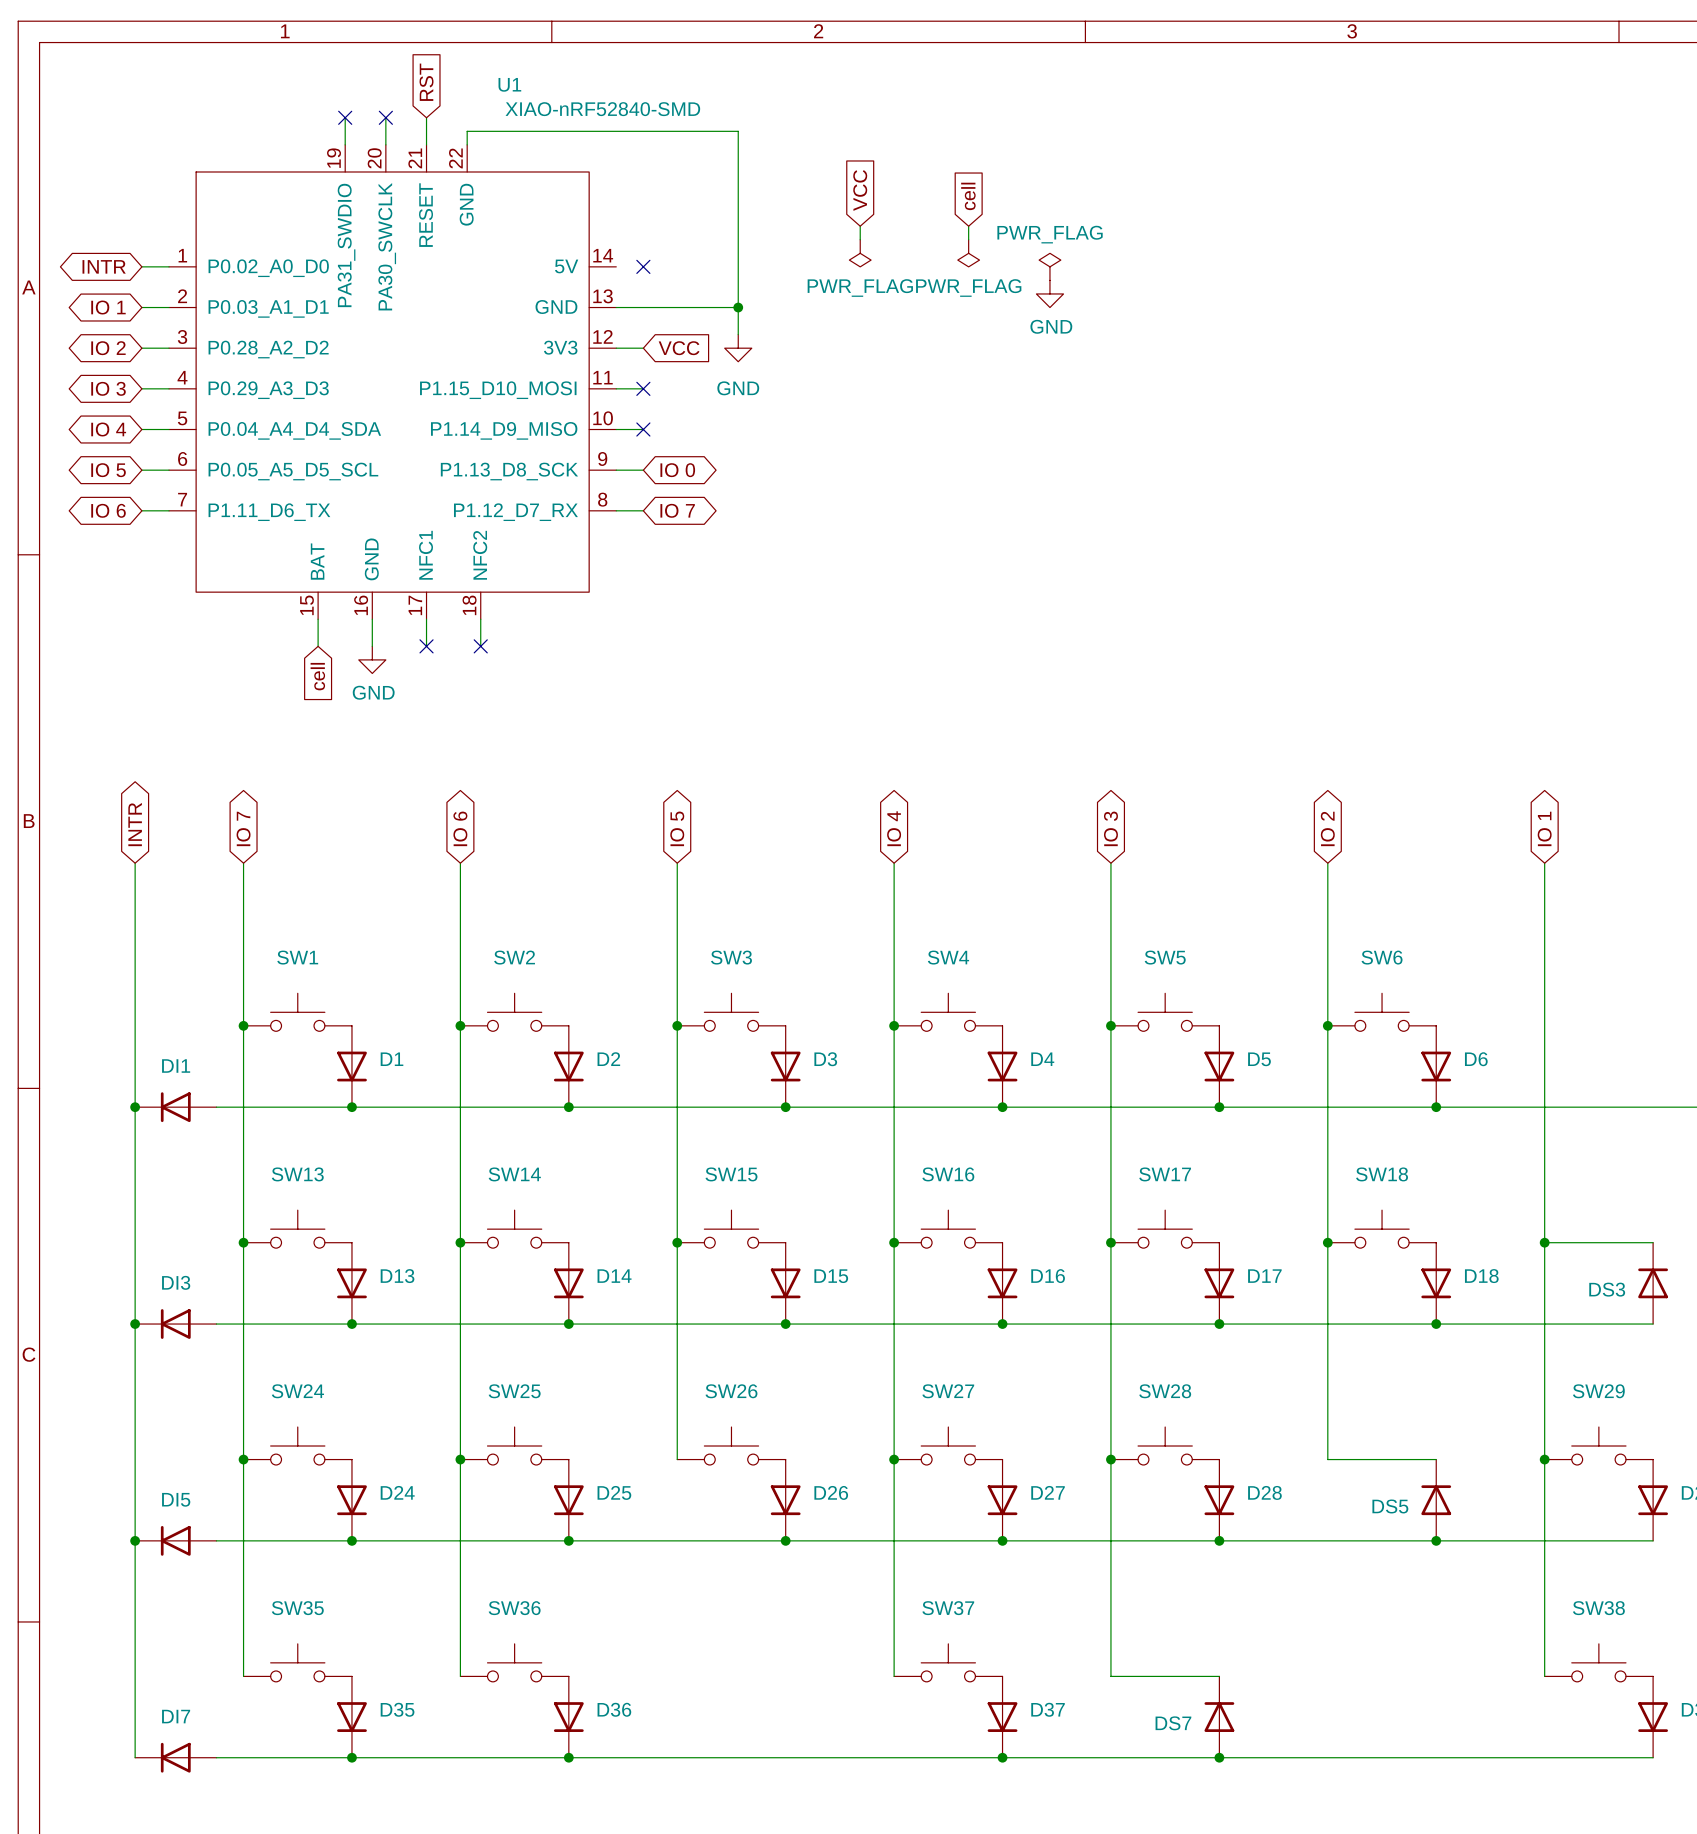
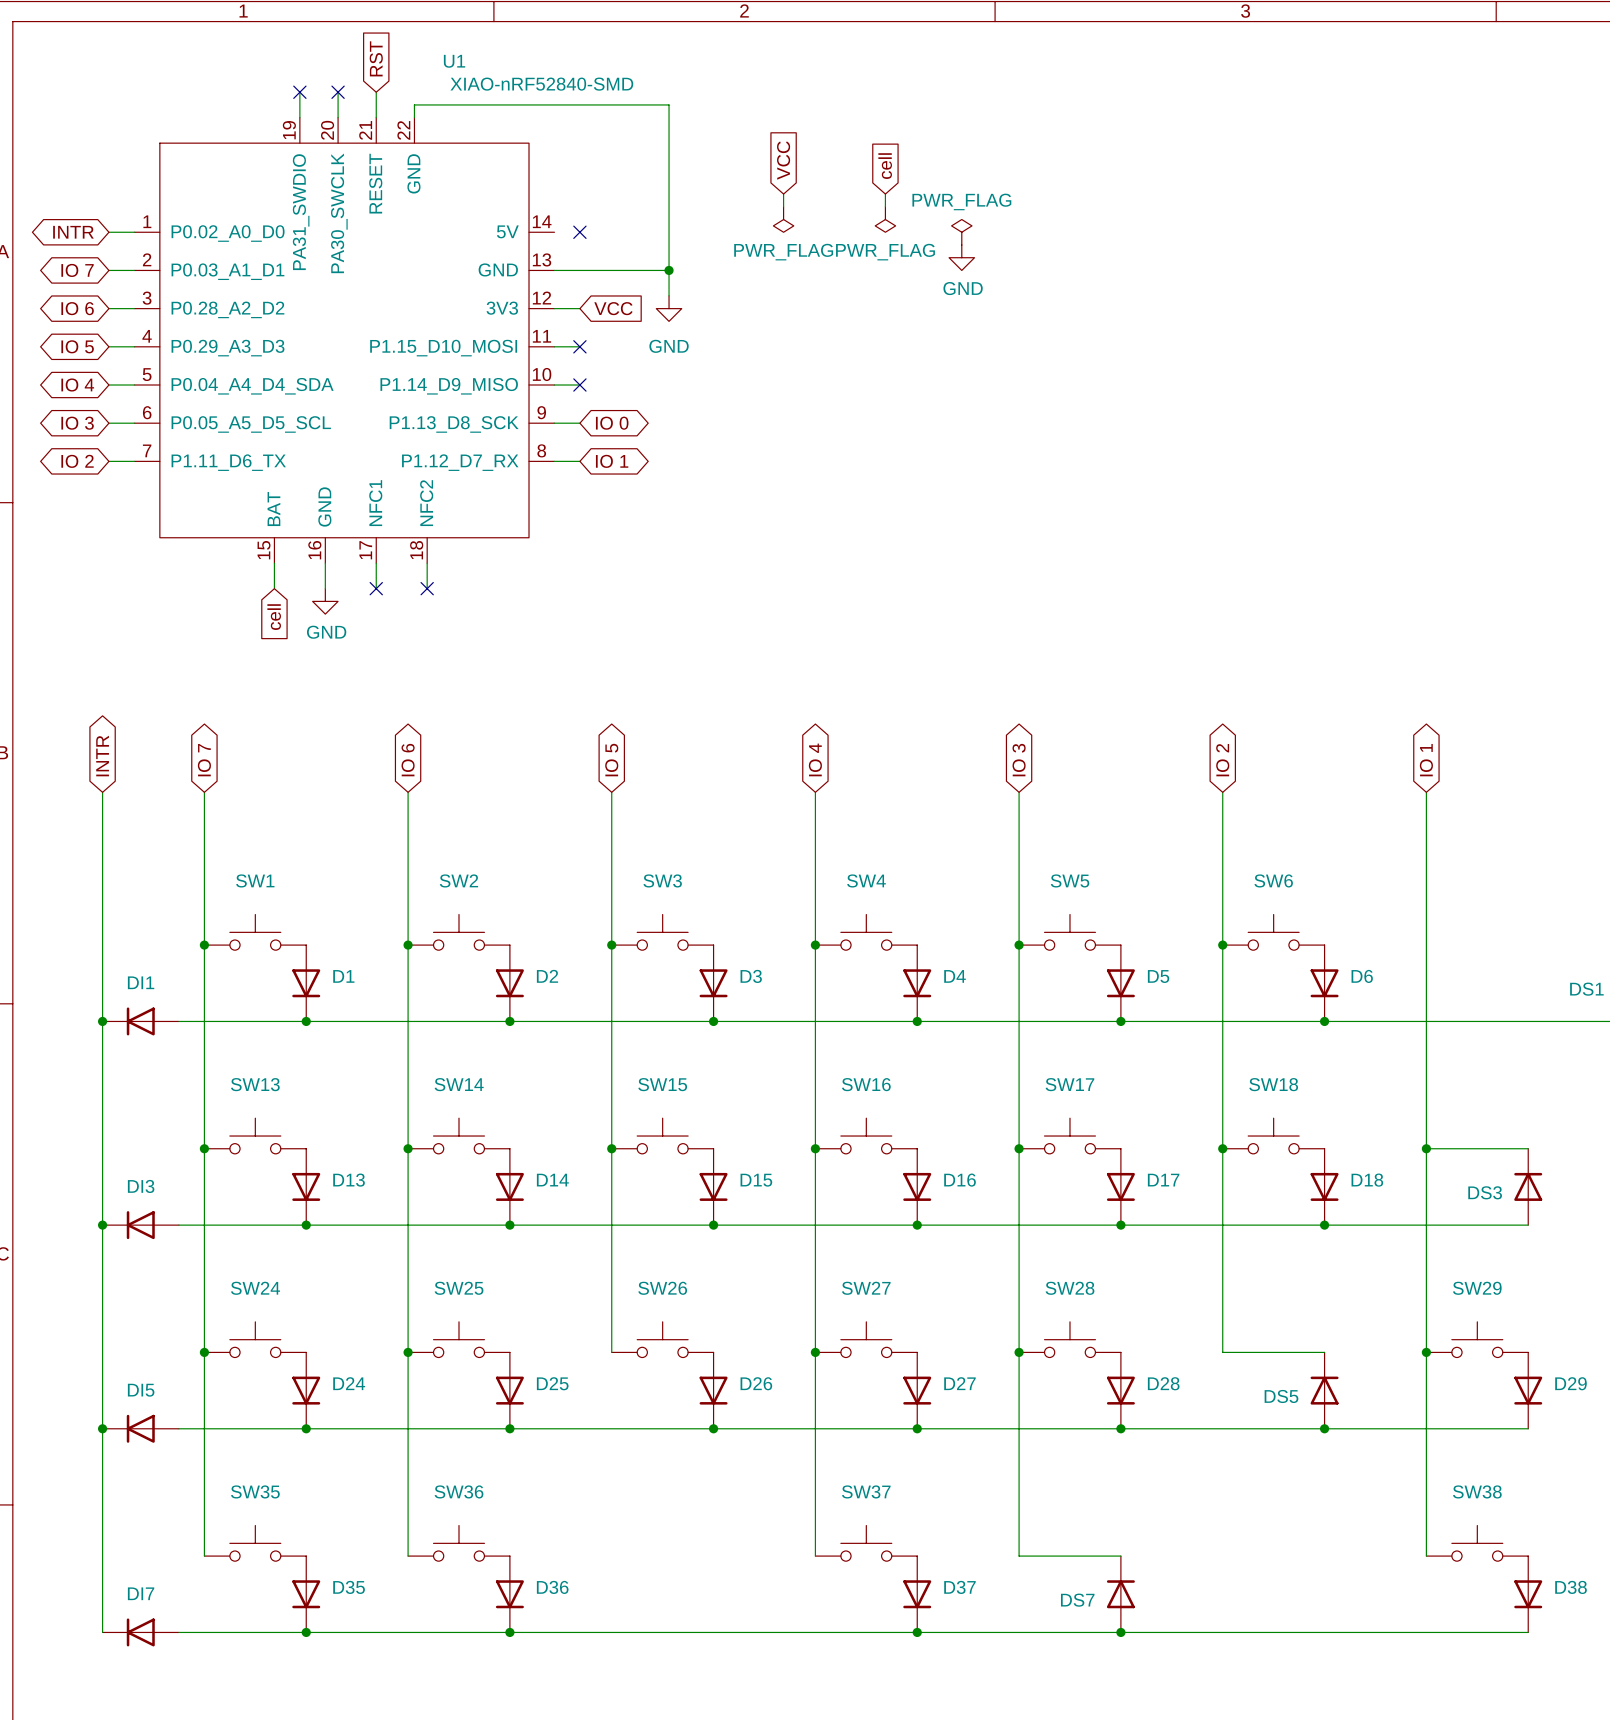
global label: IO 1 (108, 307) -> IO 7 (77, 270)
global label: IO 2 (108, 348) -> IO 6 (77, 308)
global label: IO 3 (108, 388) -> IO 5 (77, 346)
global label: IO 5 (108, 470) -> IO 3 (77, 423)
global label: IO 6 (108, 510) -> IO 2 (77, 461)
global label: IO 7 (677, 510) -> IO 1 (612, 461)

